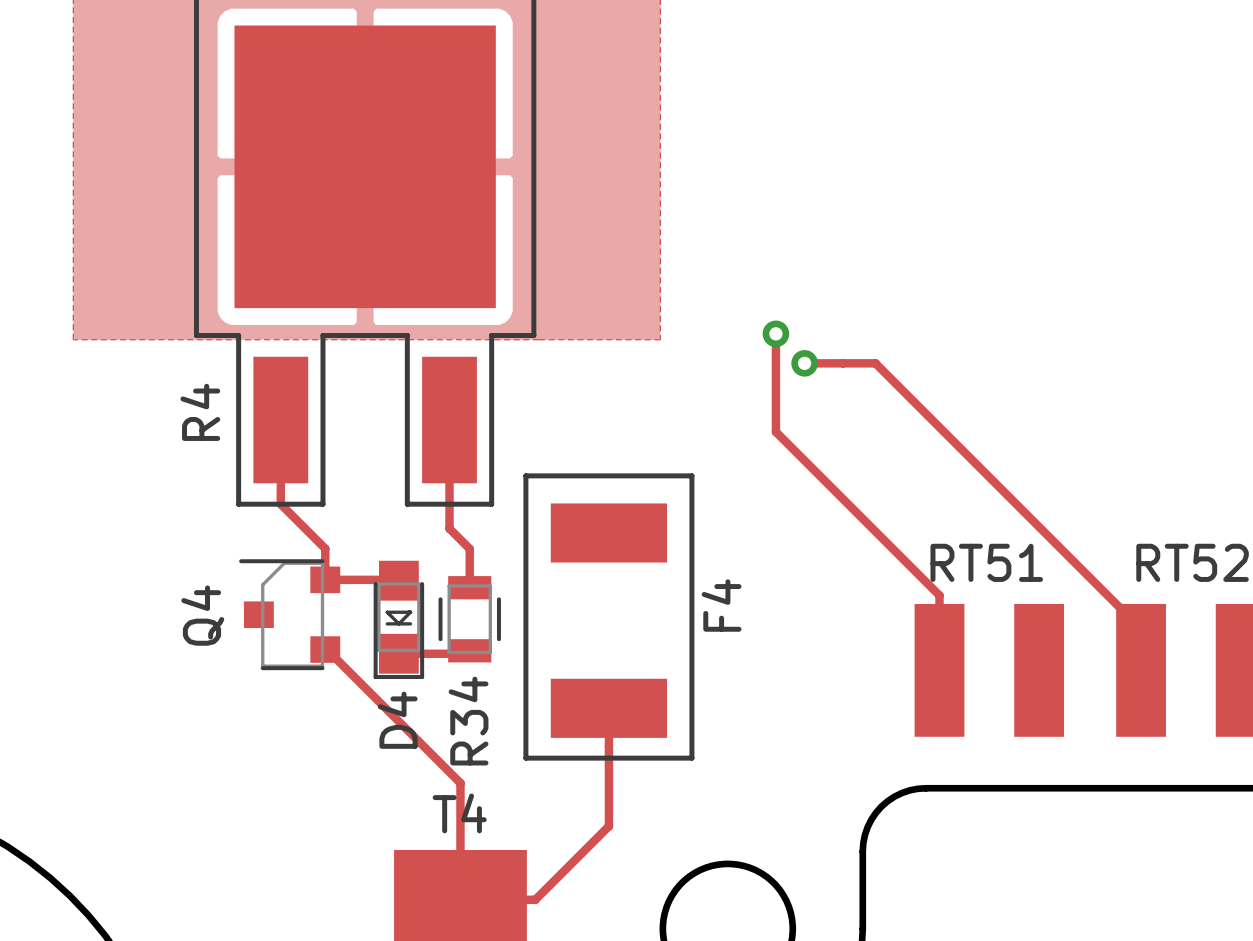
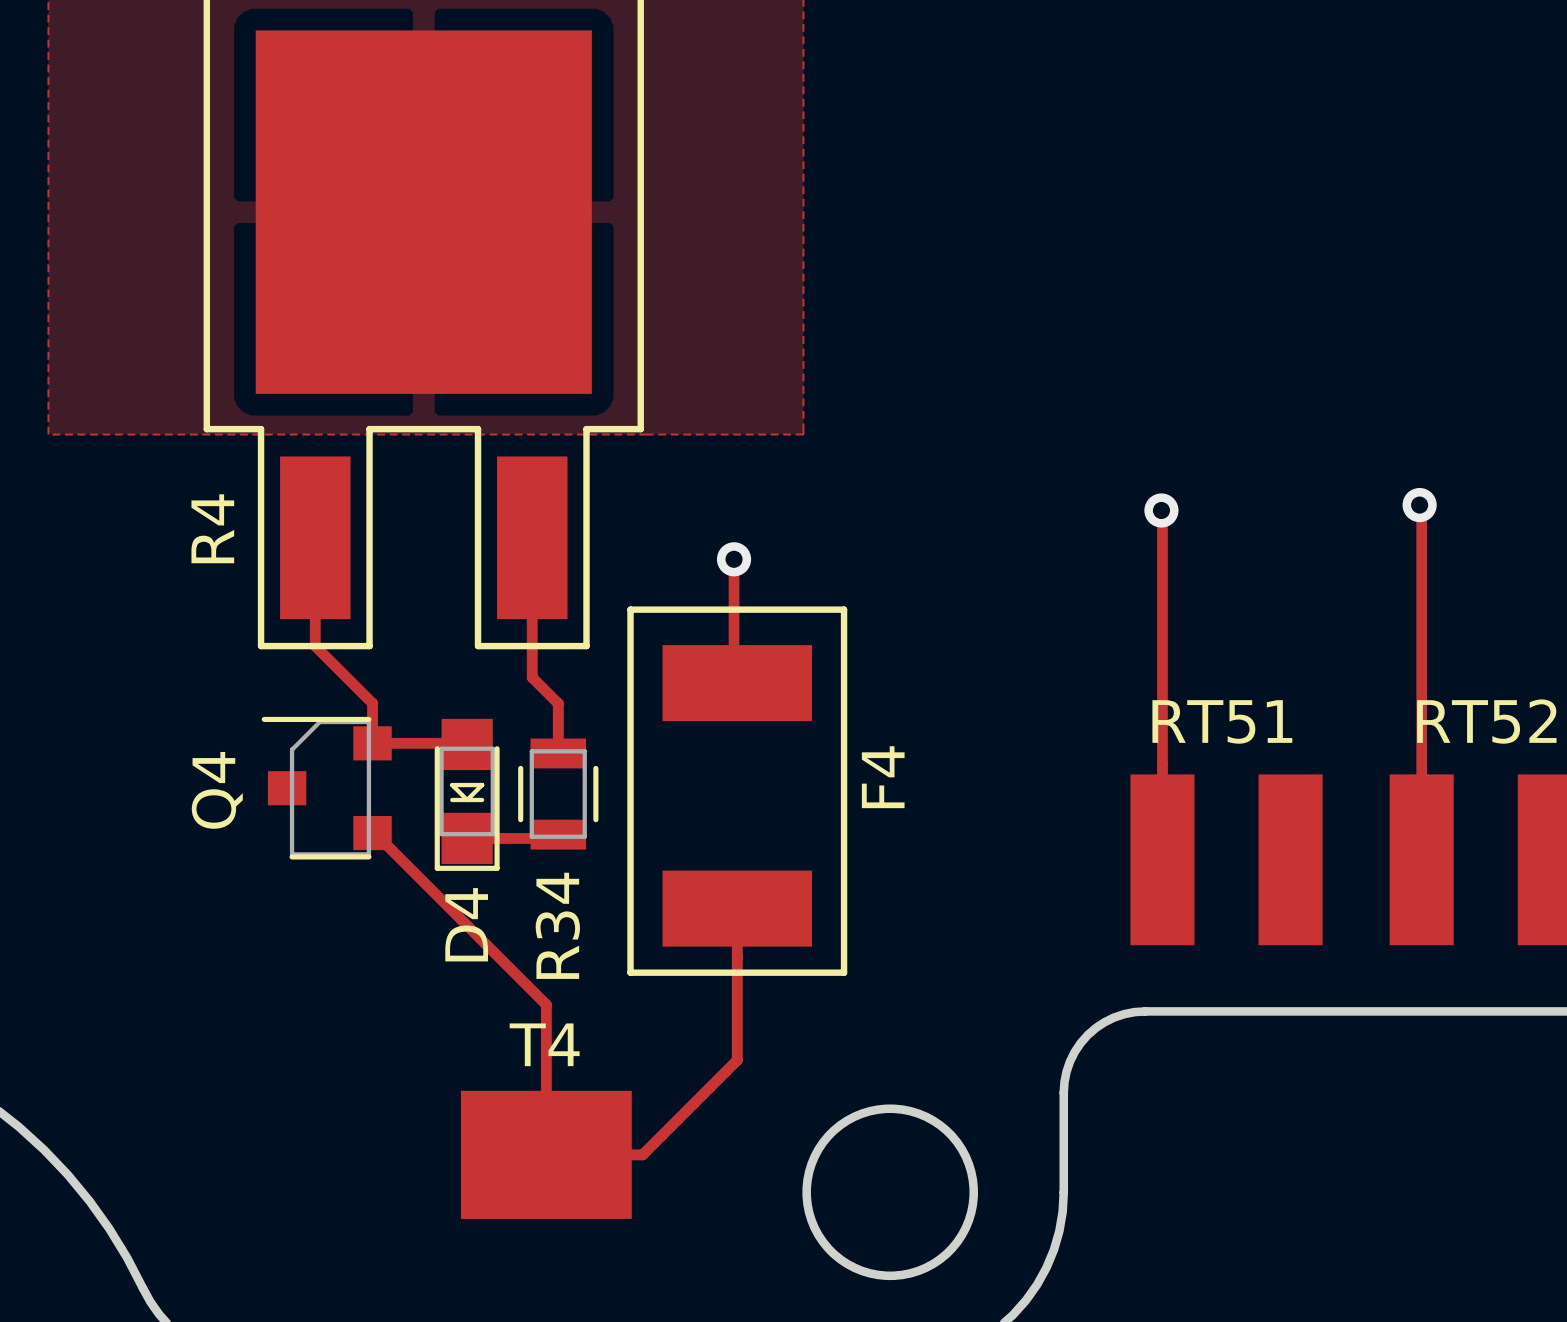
track: (775, 333) (775, 431) (939, 595) -> (1161, 510) (1162, 763)
via: (775, 333) -> none
track: (804, 363) (875, 363) (1141, 628) -> (1419, 505) (1421, 507) (1421, 806)
via: (804, 363) -> none
via: none -> (1419, 505)
via: none -> (1161, 510)
track: none -> (734, 559) (734, 679) (737, 683)
via: none -> (734, 559)

